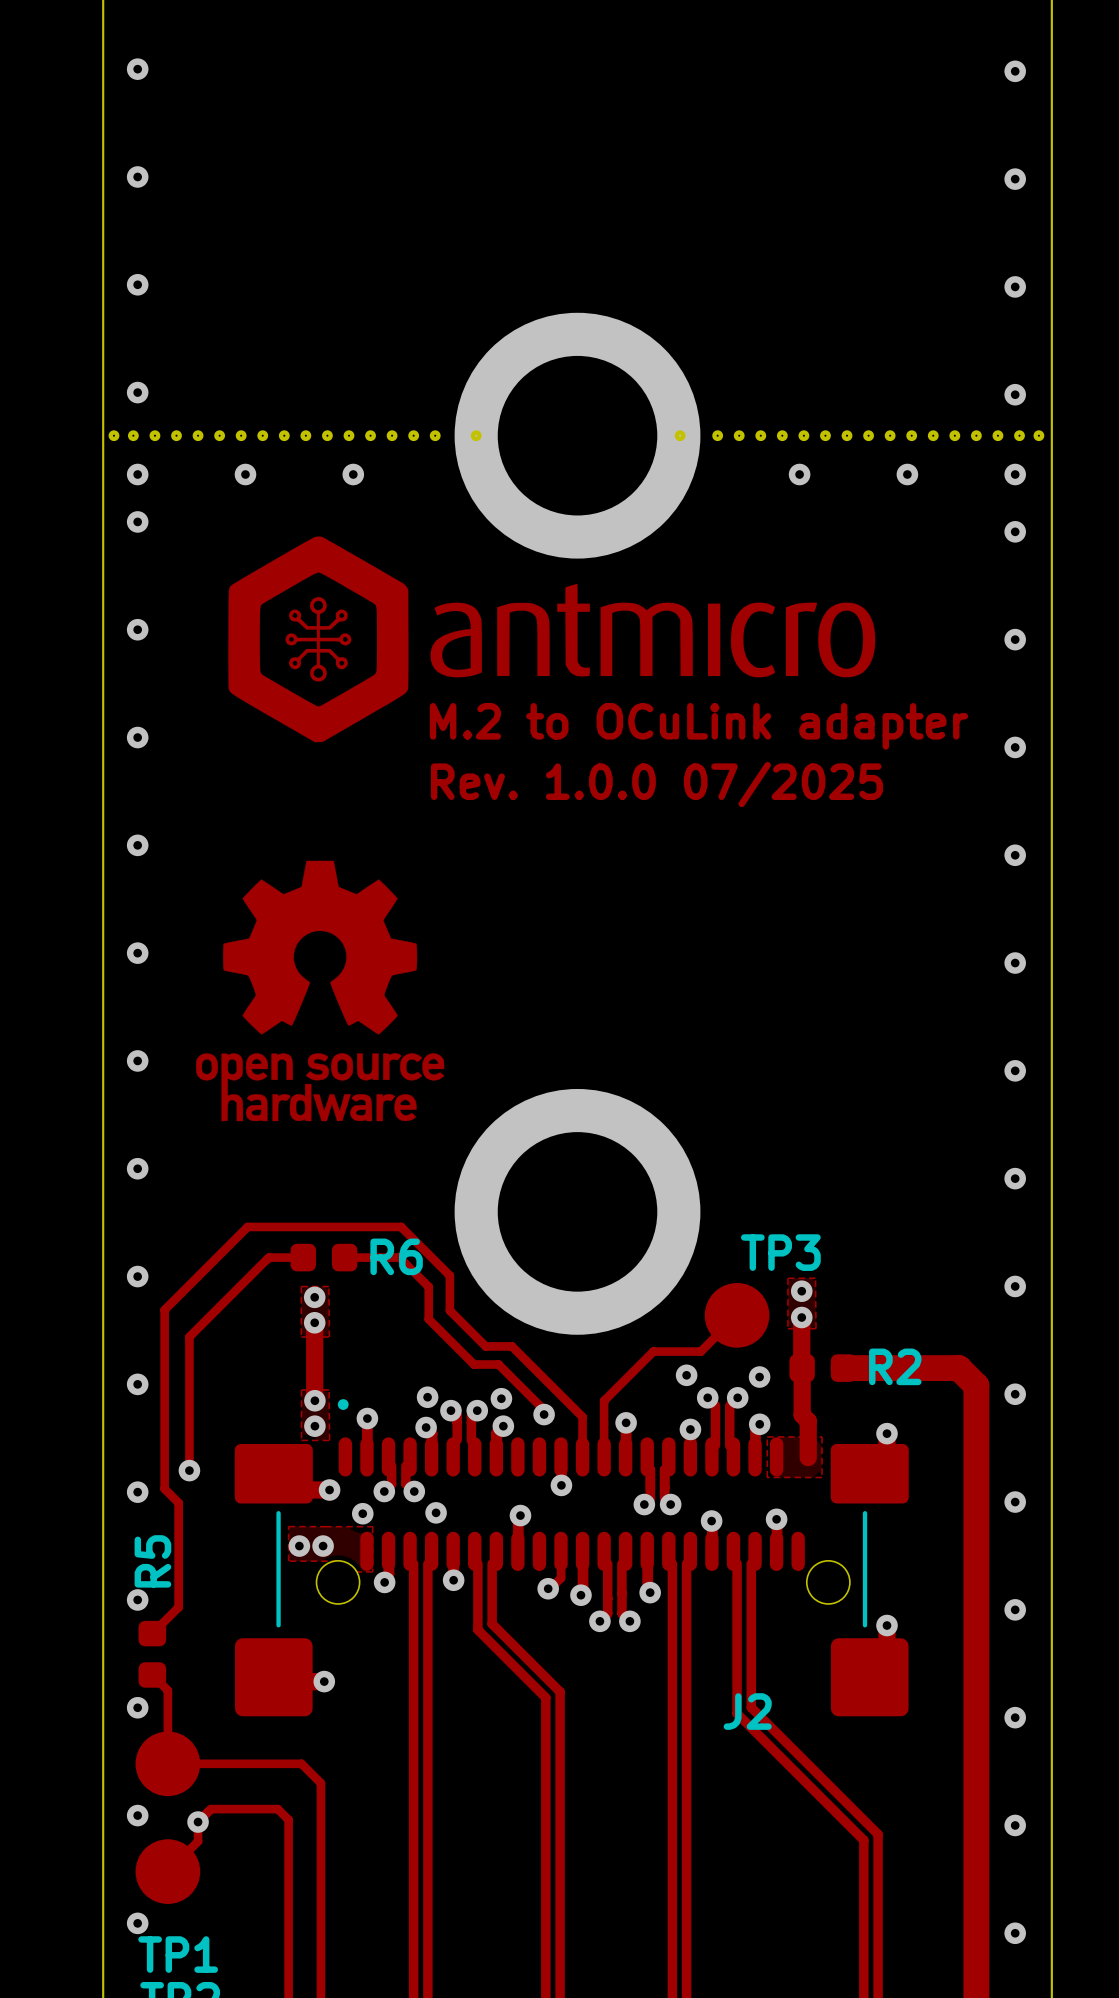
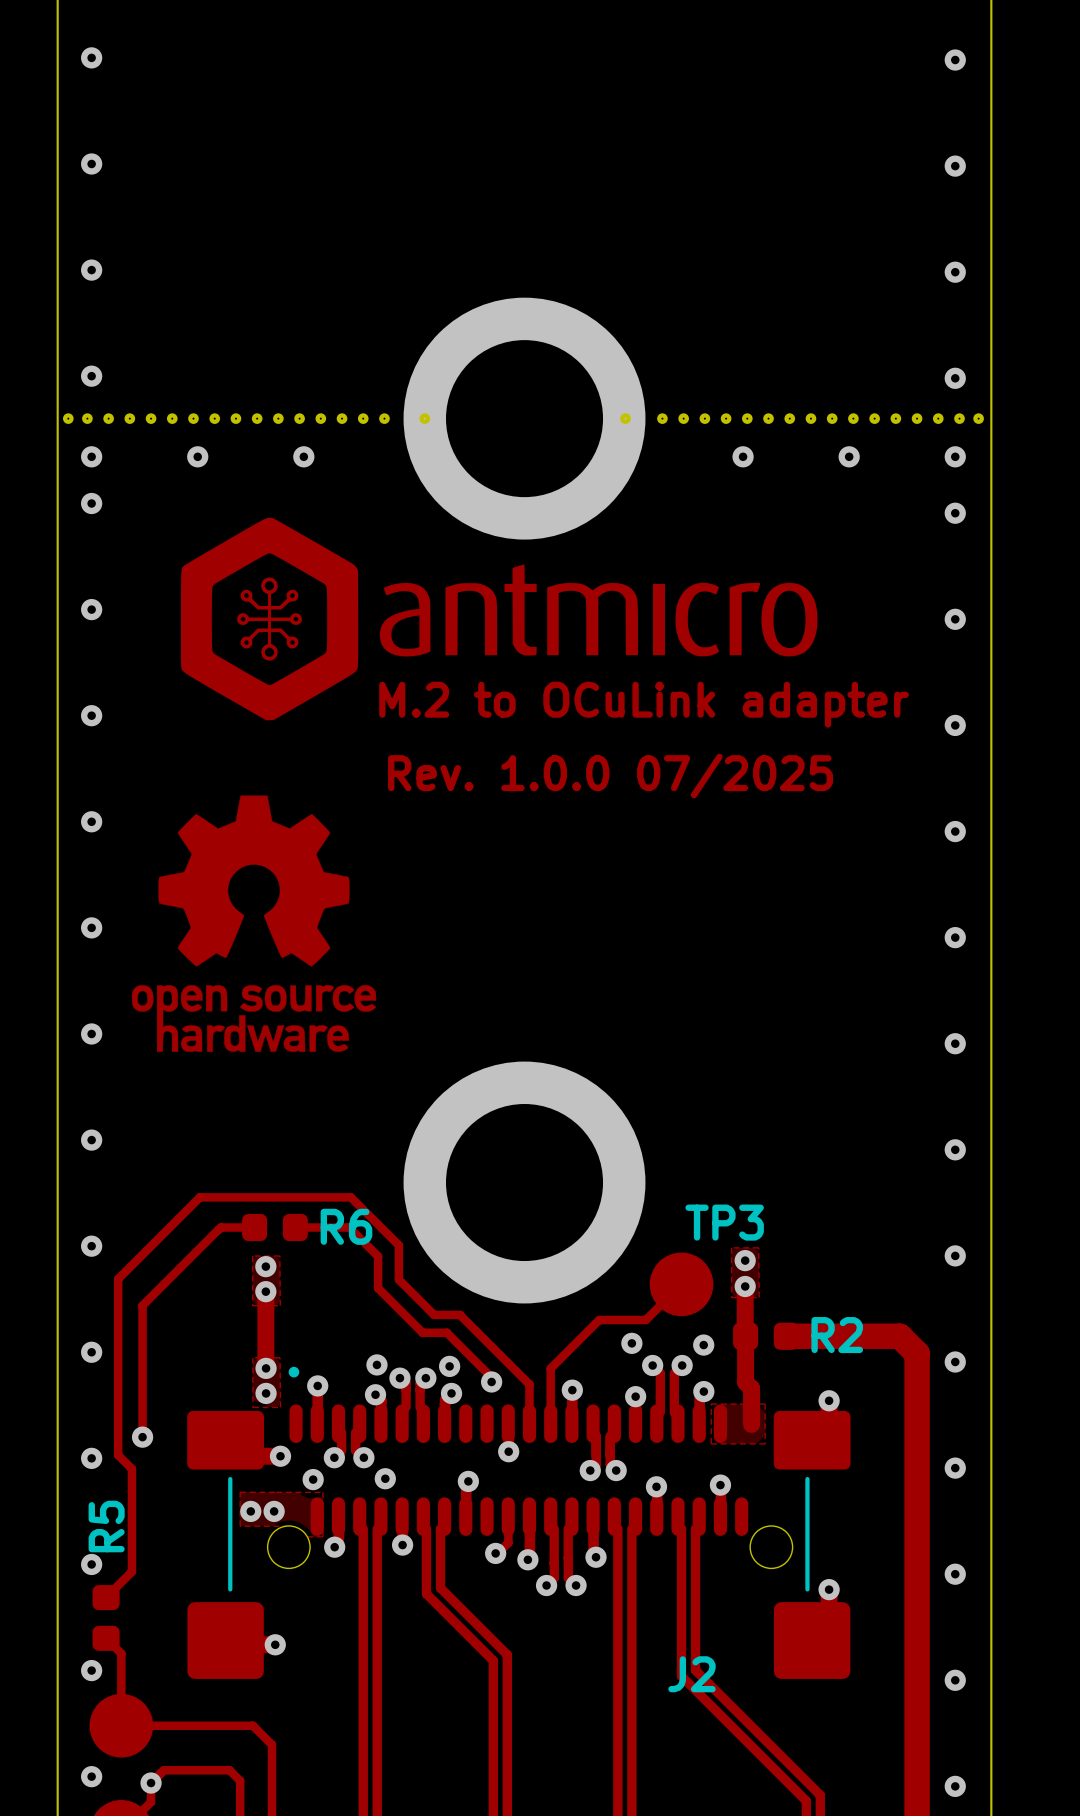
text position: Rev. 1.0.0 07/2025 (656, 784) -> Rev. 1.0.0 07/2025 (610, 775)
drawing position: (320, 991) -> (254, 923)

